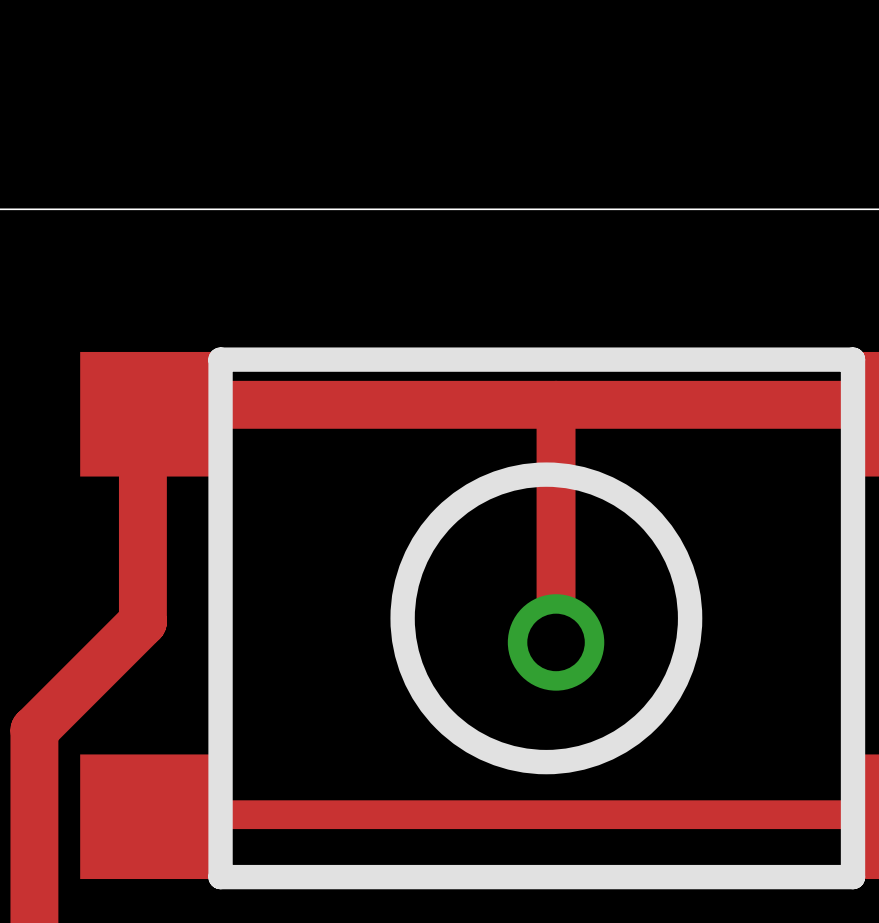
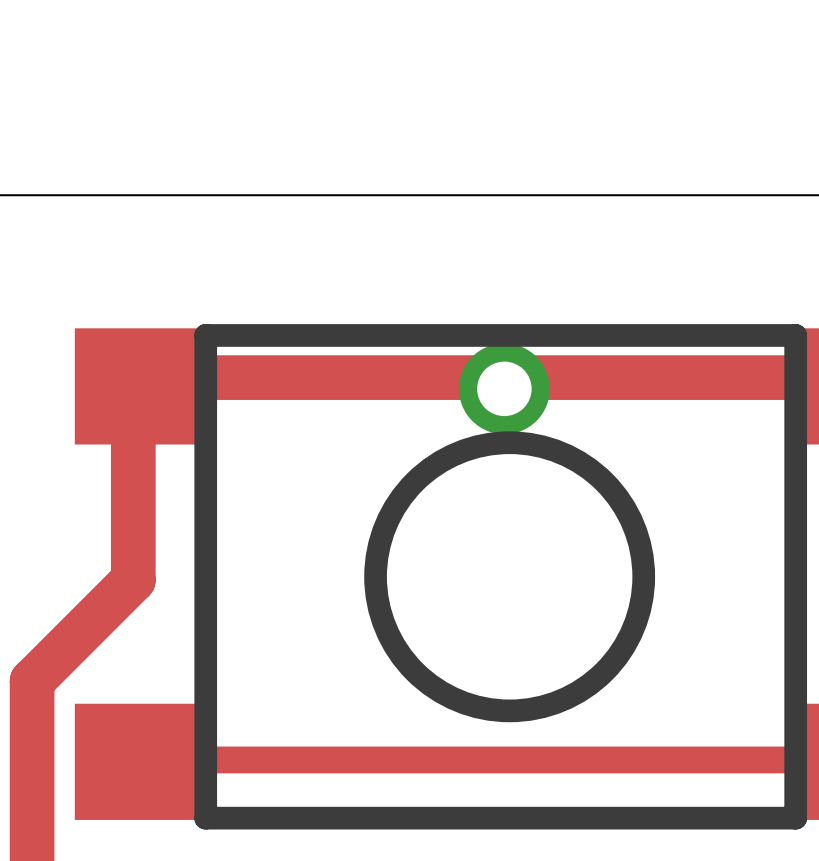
top track: (556, 404) (556, 642) -> none
via: none -> (504, 388)
via: (556, 642) -> none

